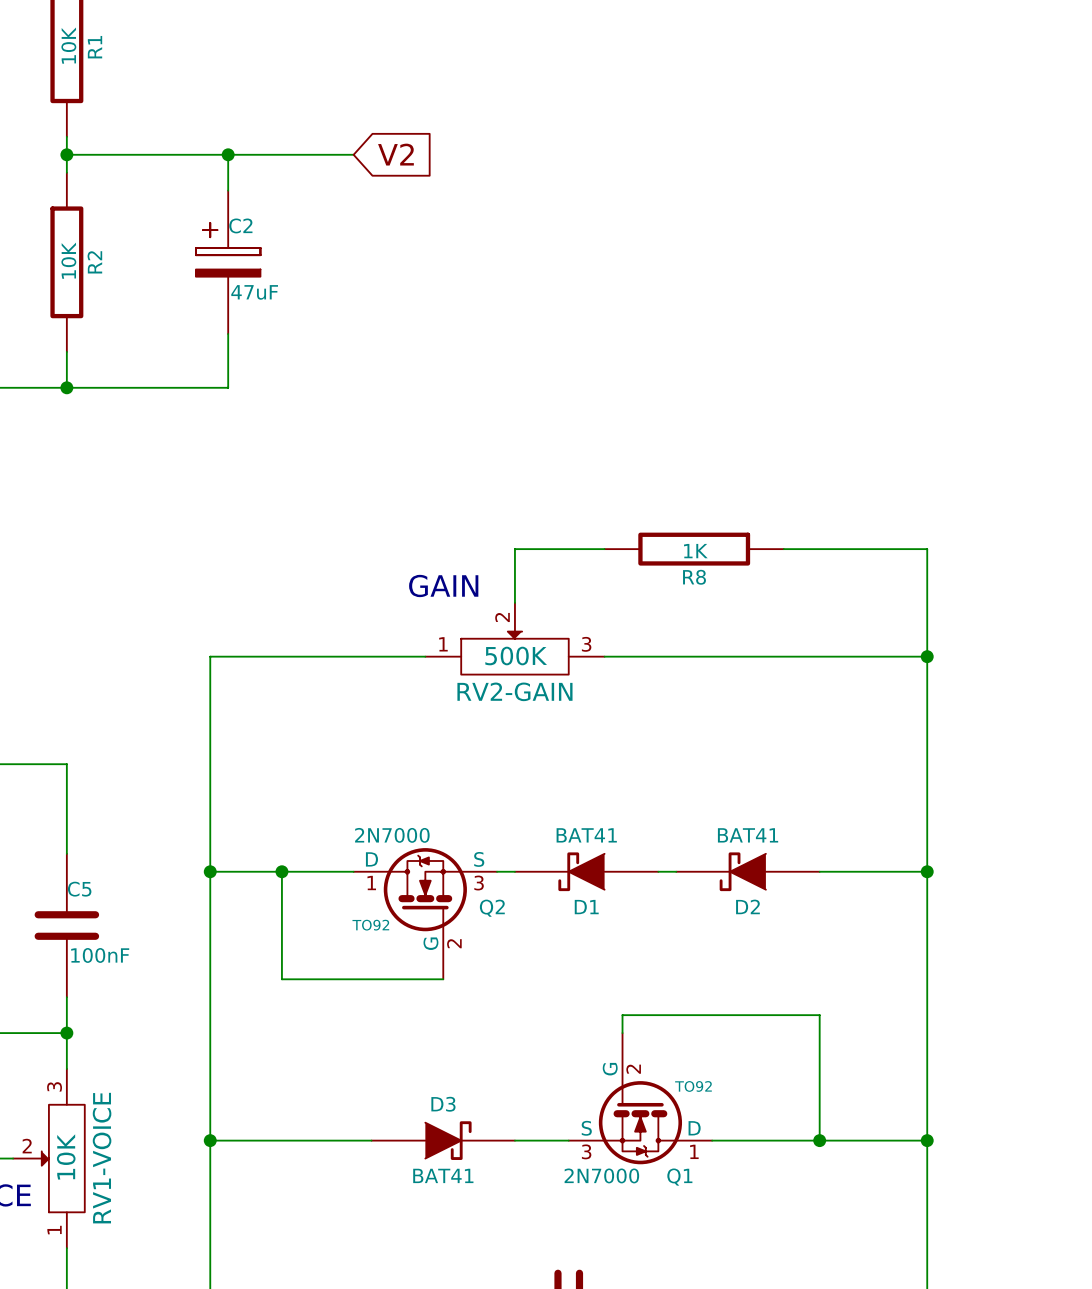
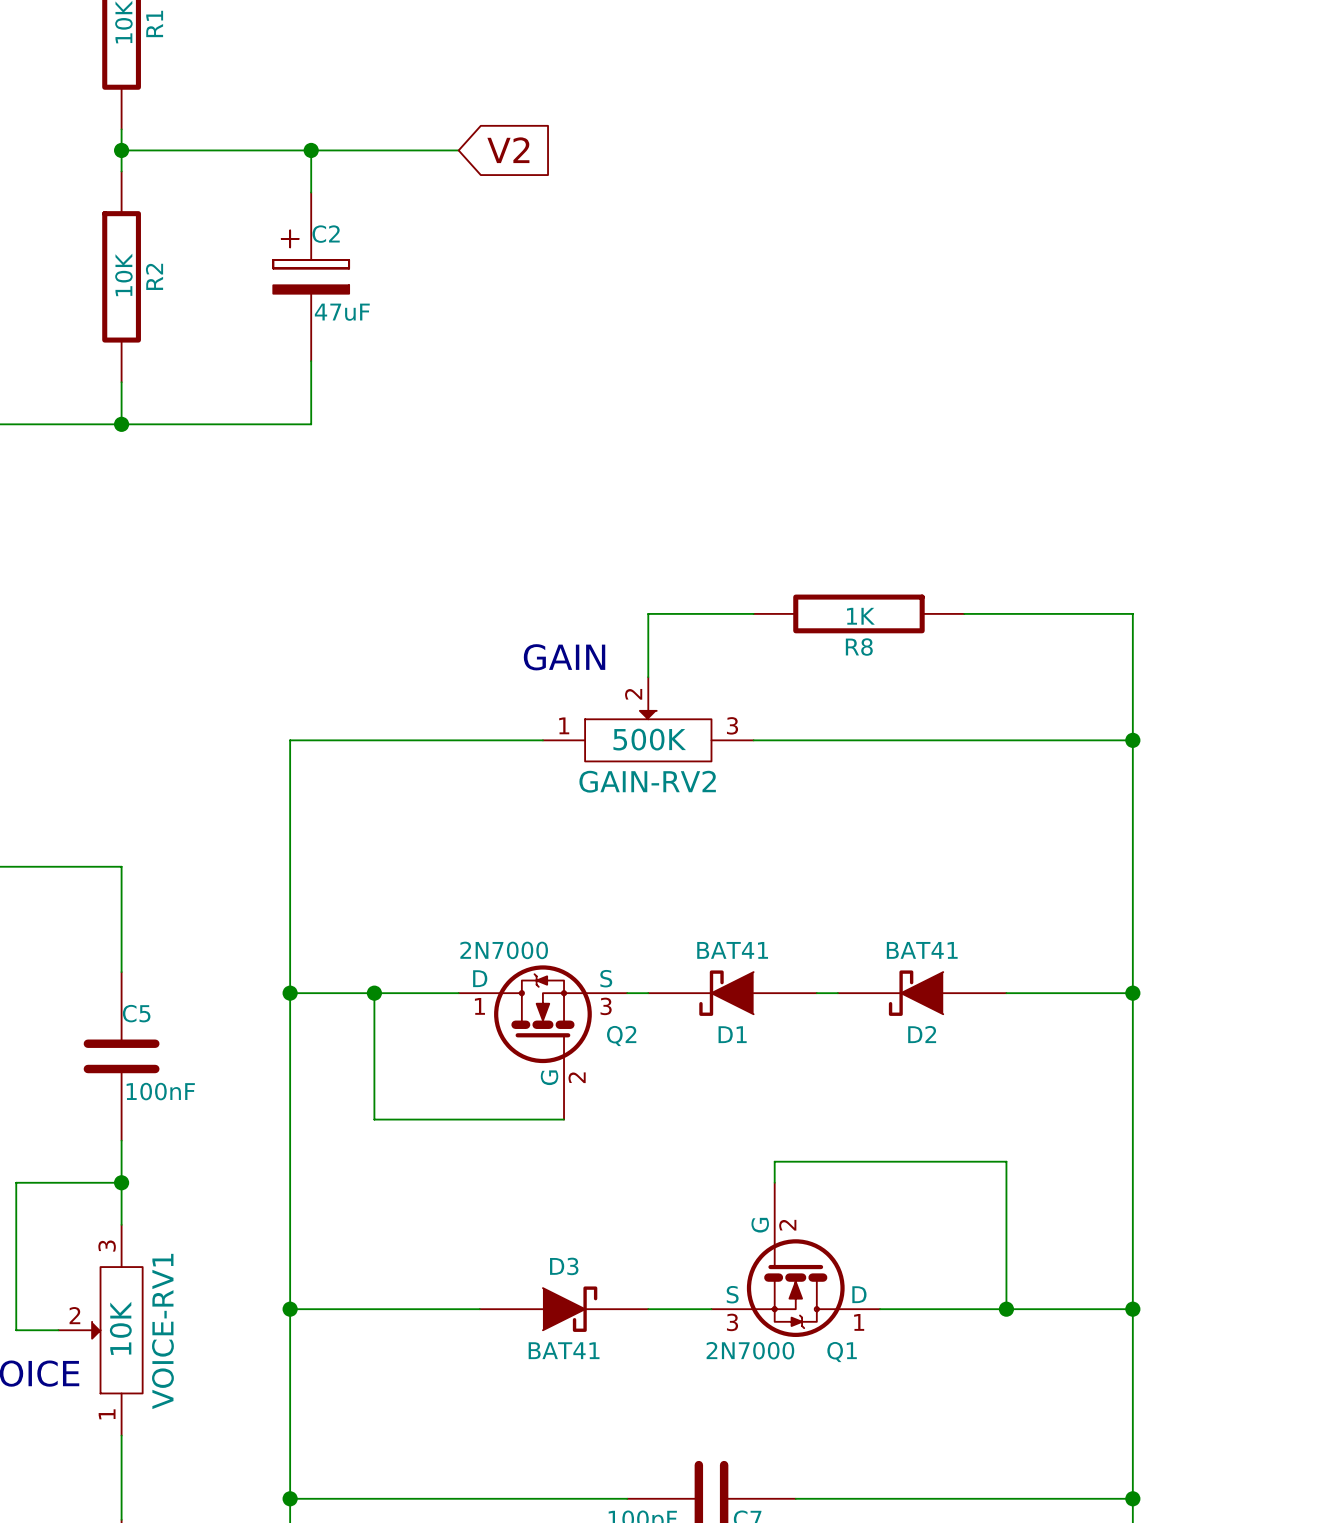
RV2-GAIN name: RV2-GAIN (514, 691) -> GAIN-RV2 (647, 781)
Q2 text: TO92 (370, 925) -> none
Q1 text: TO92 (693, 1086) -> none
RV1-VOICE name: RV1-VOICE (102, 1158) -> VOICE-RV1 (162, 1331)

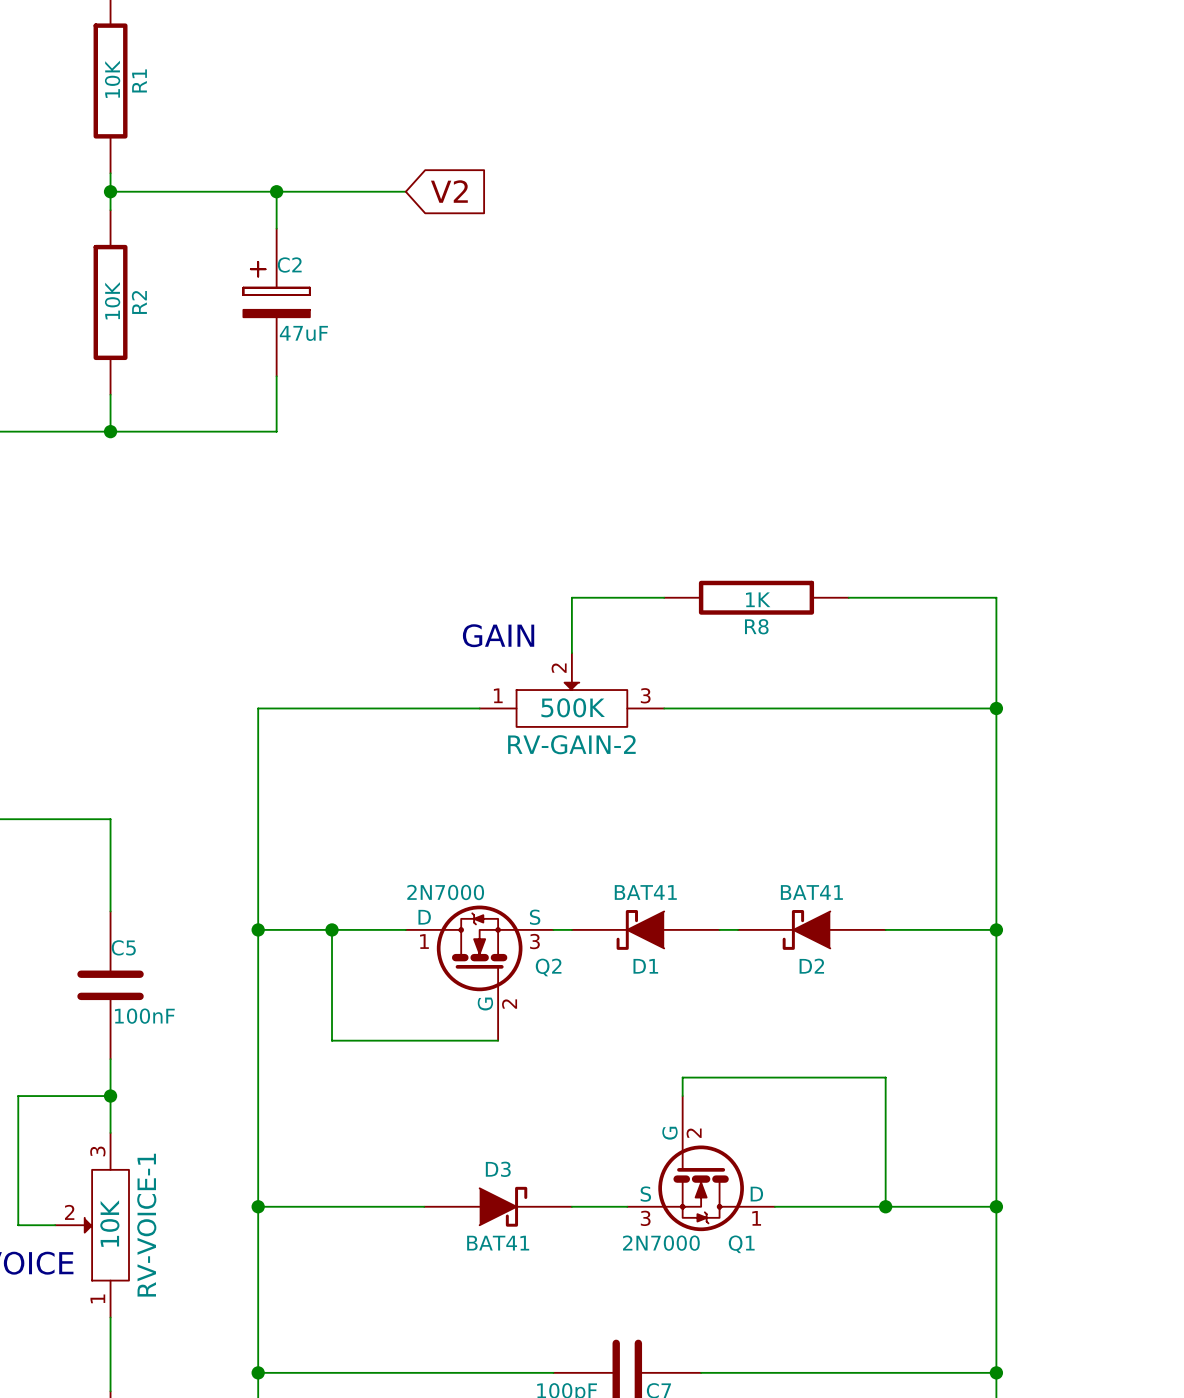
GAIN-RV2 name: GAIN-RV2 (647, 781) -> RV-GAIN-2 (571, 744)
VOICE-RV1 name: VOICE-RV1 (162, 1331) -> RV-VOICE-1 (146, 1225)

